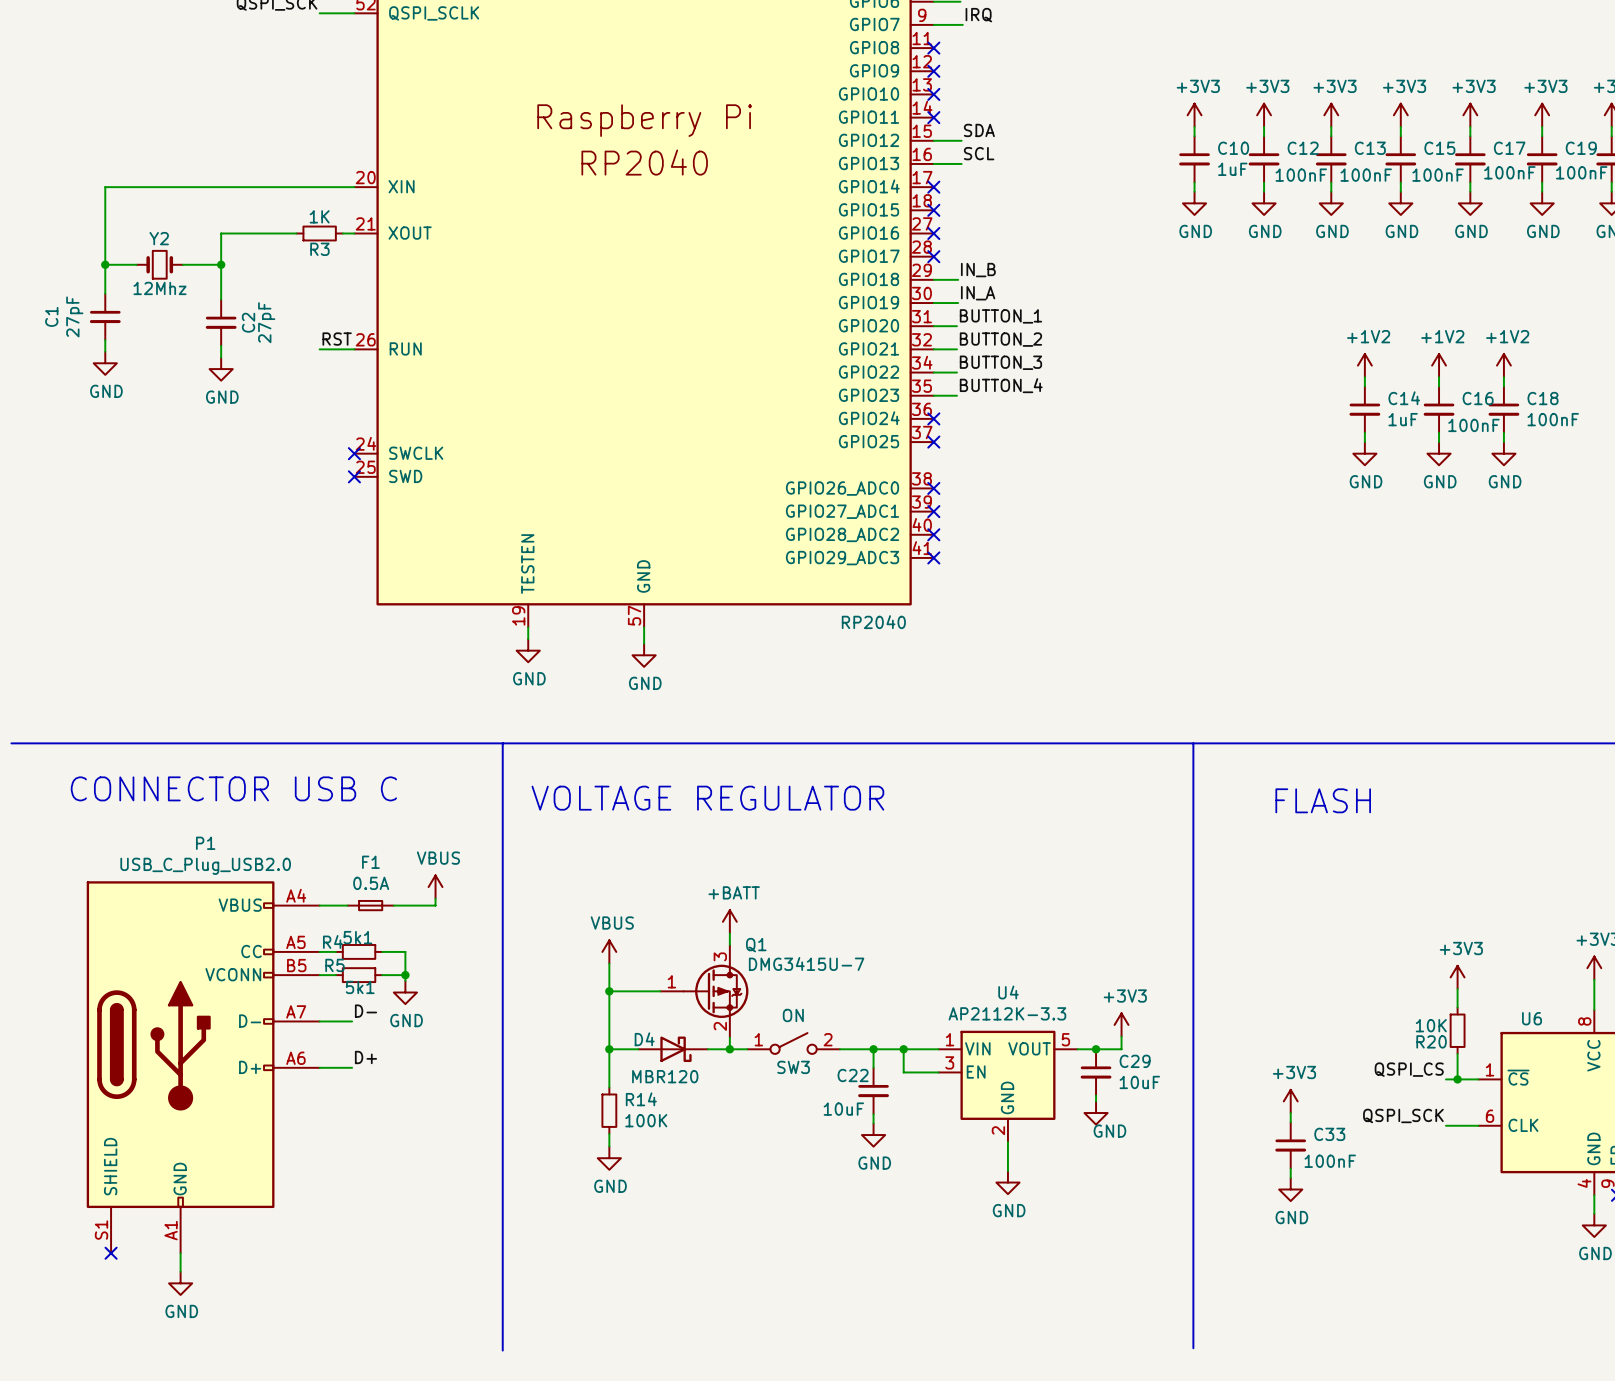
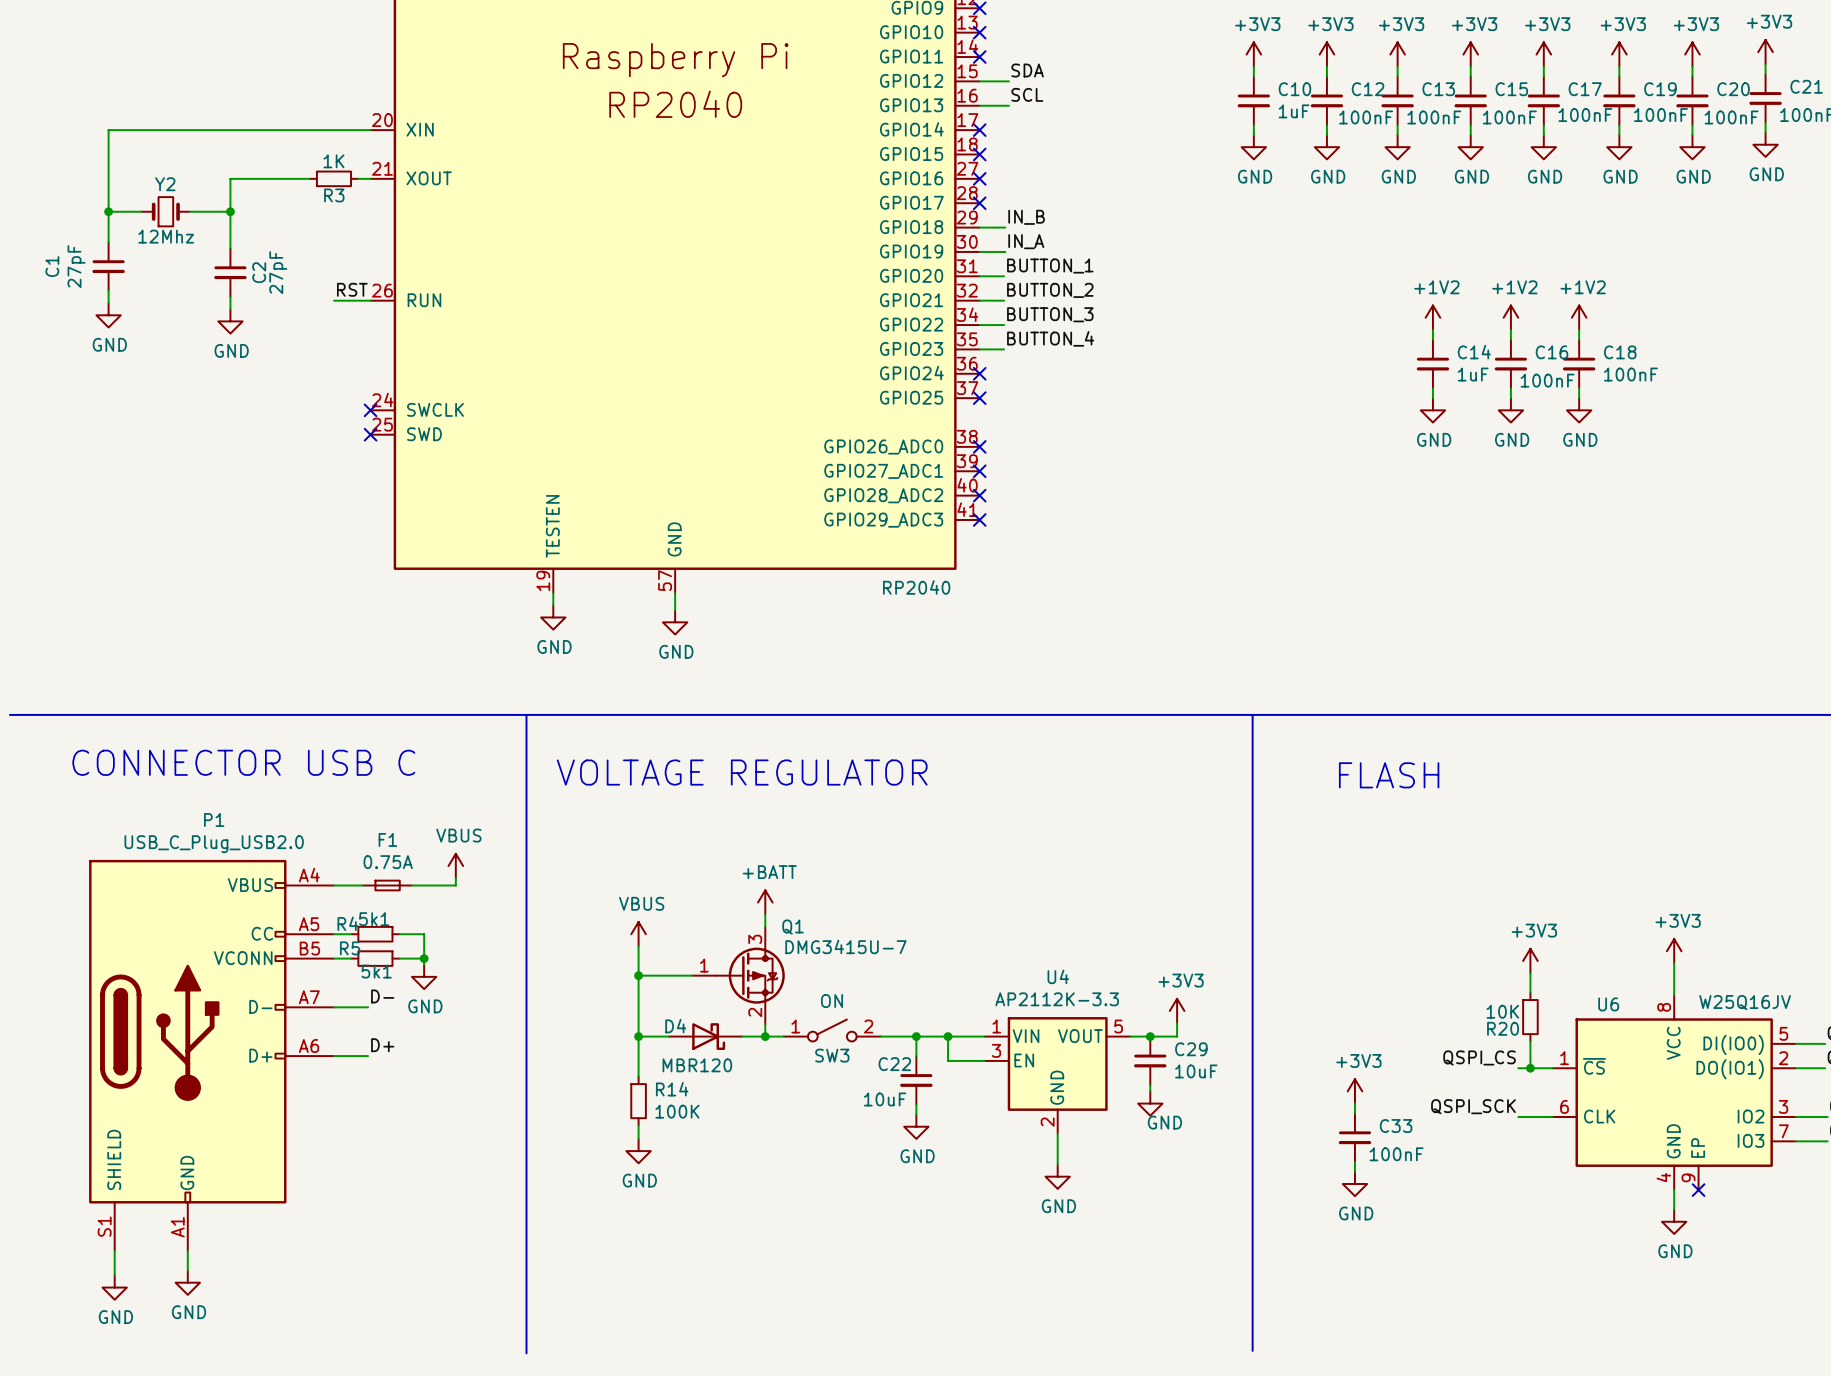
F1 value: 0.5A (371, 883) -> 0.75A (388, 862)
wire: none -> (114, 1251) (114, 1275)
no-connect mark: (111, 1253) -> none
power symbol: none -> GND (114, 1287)

